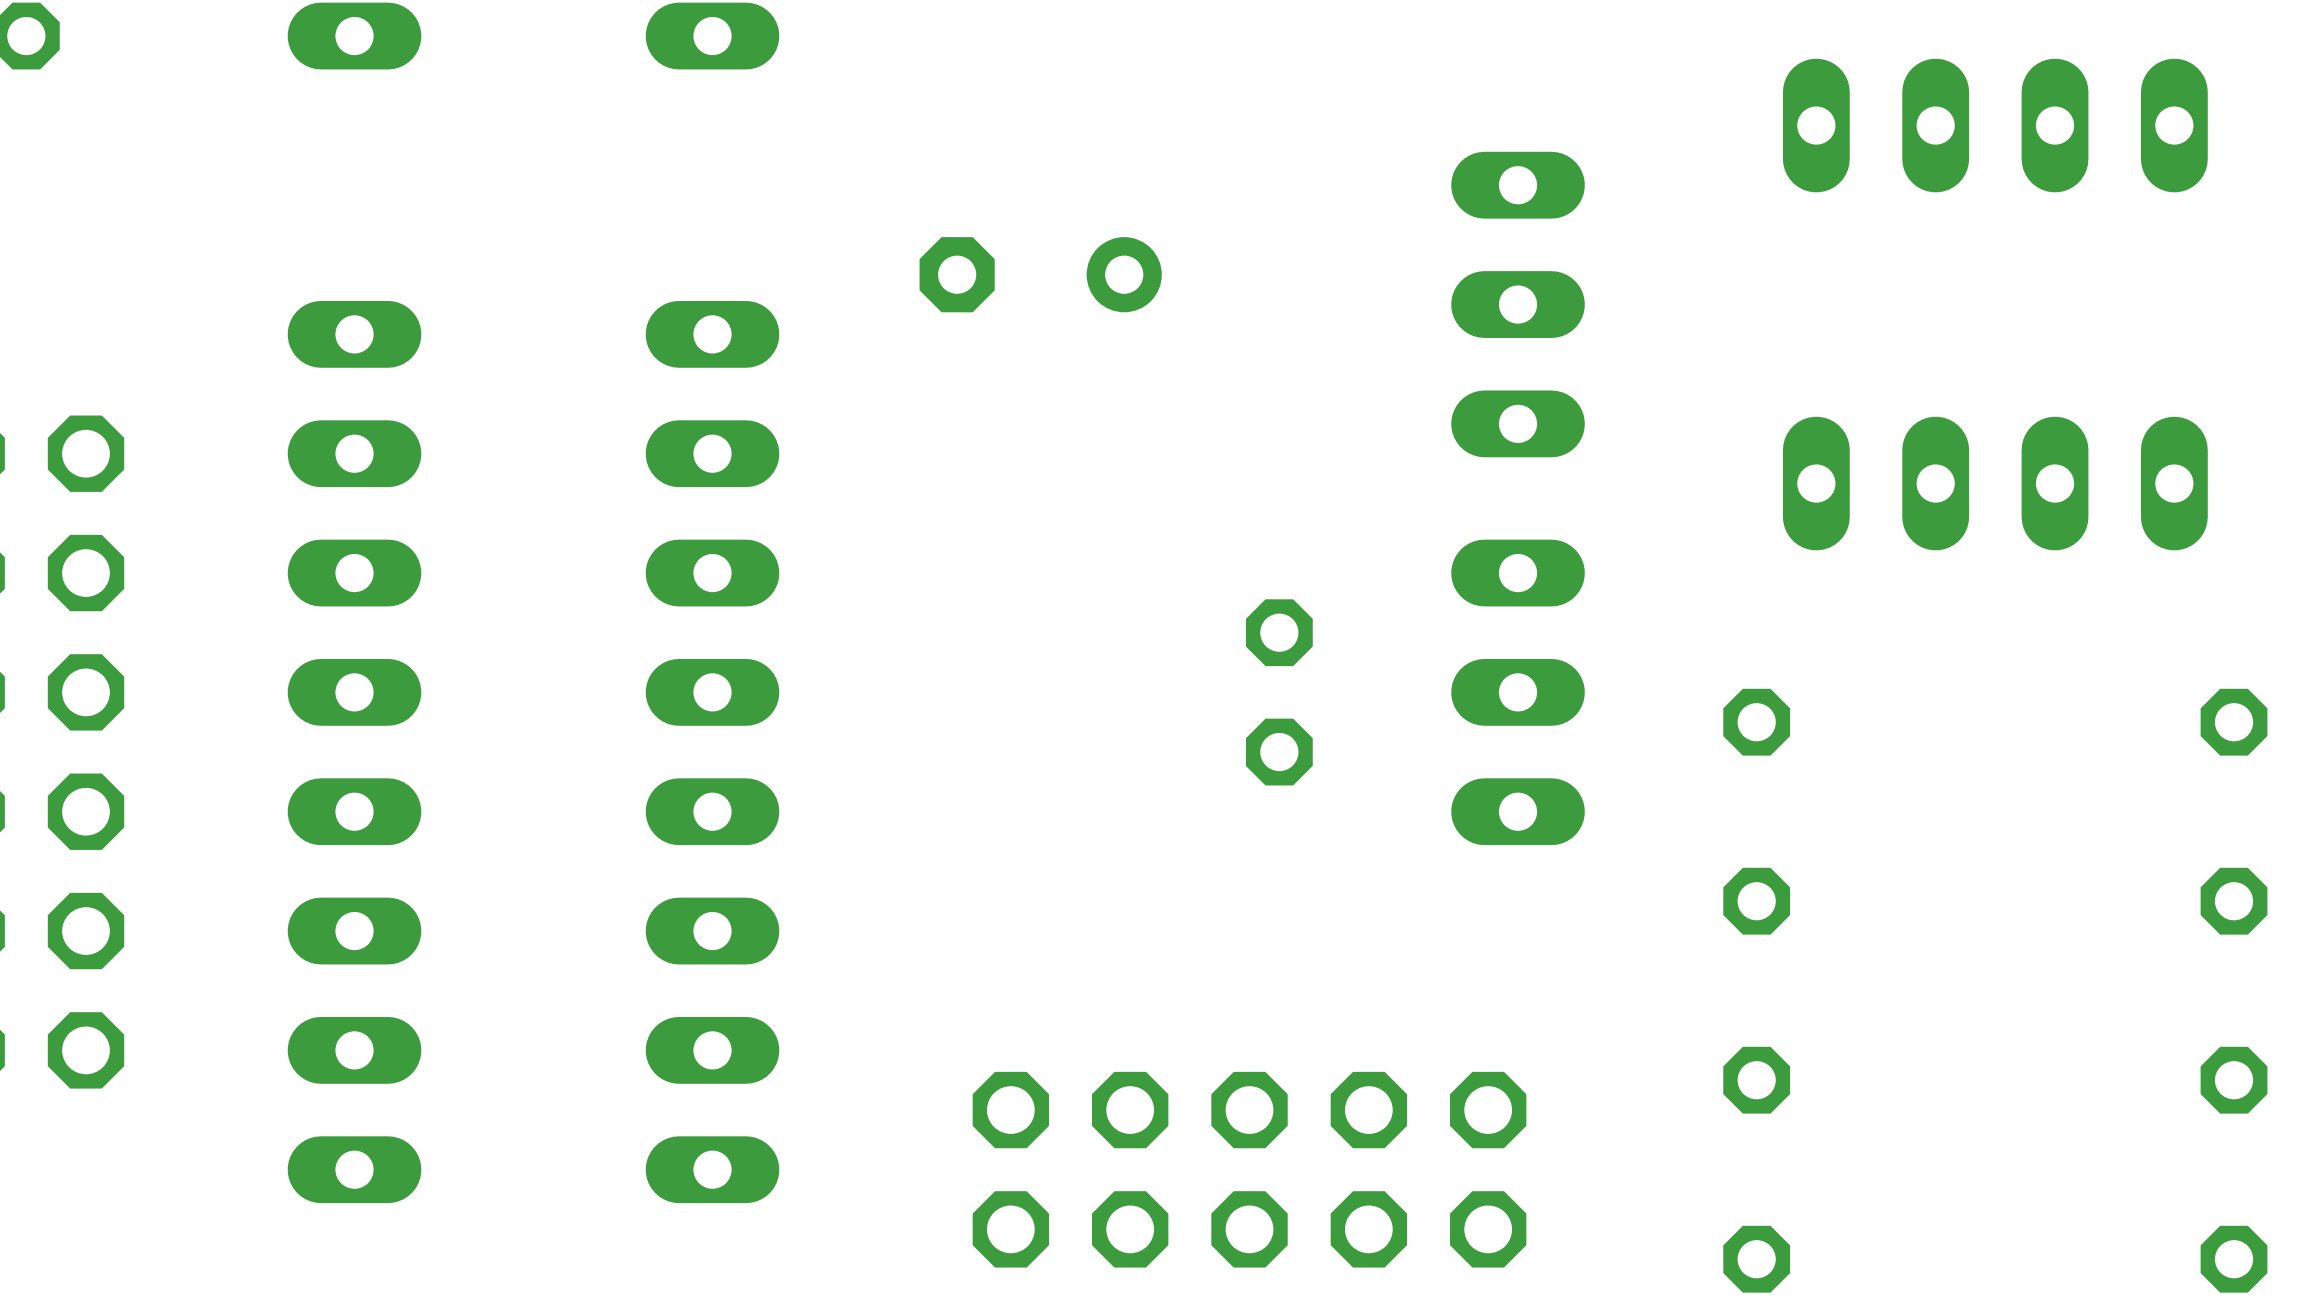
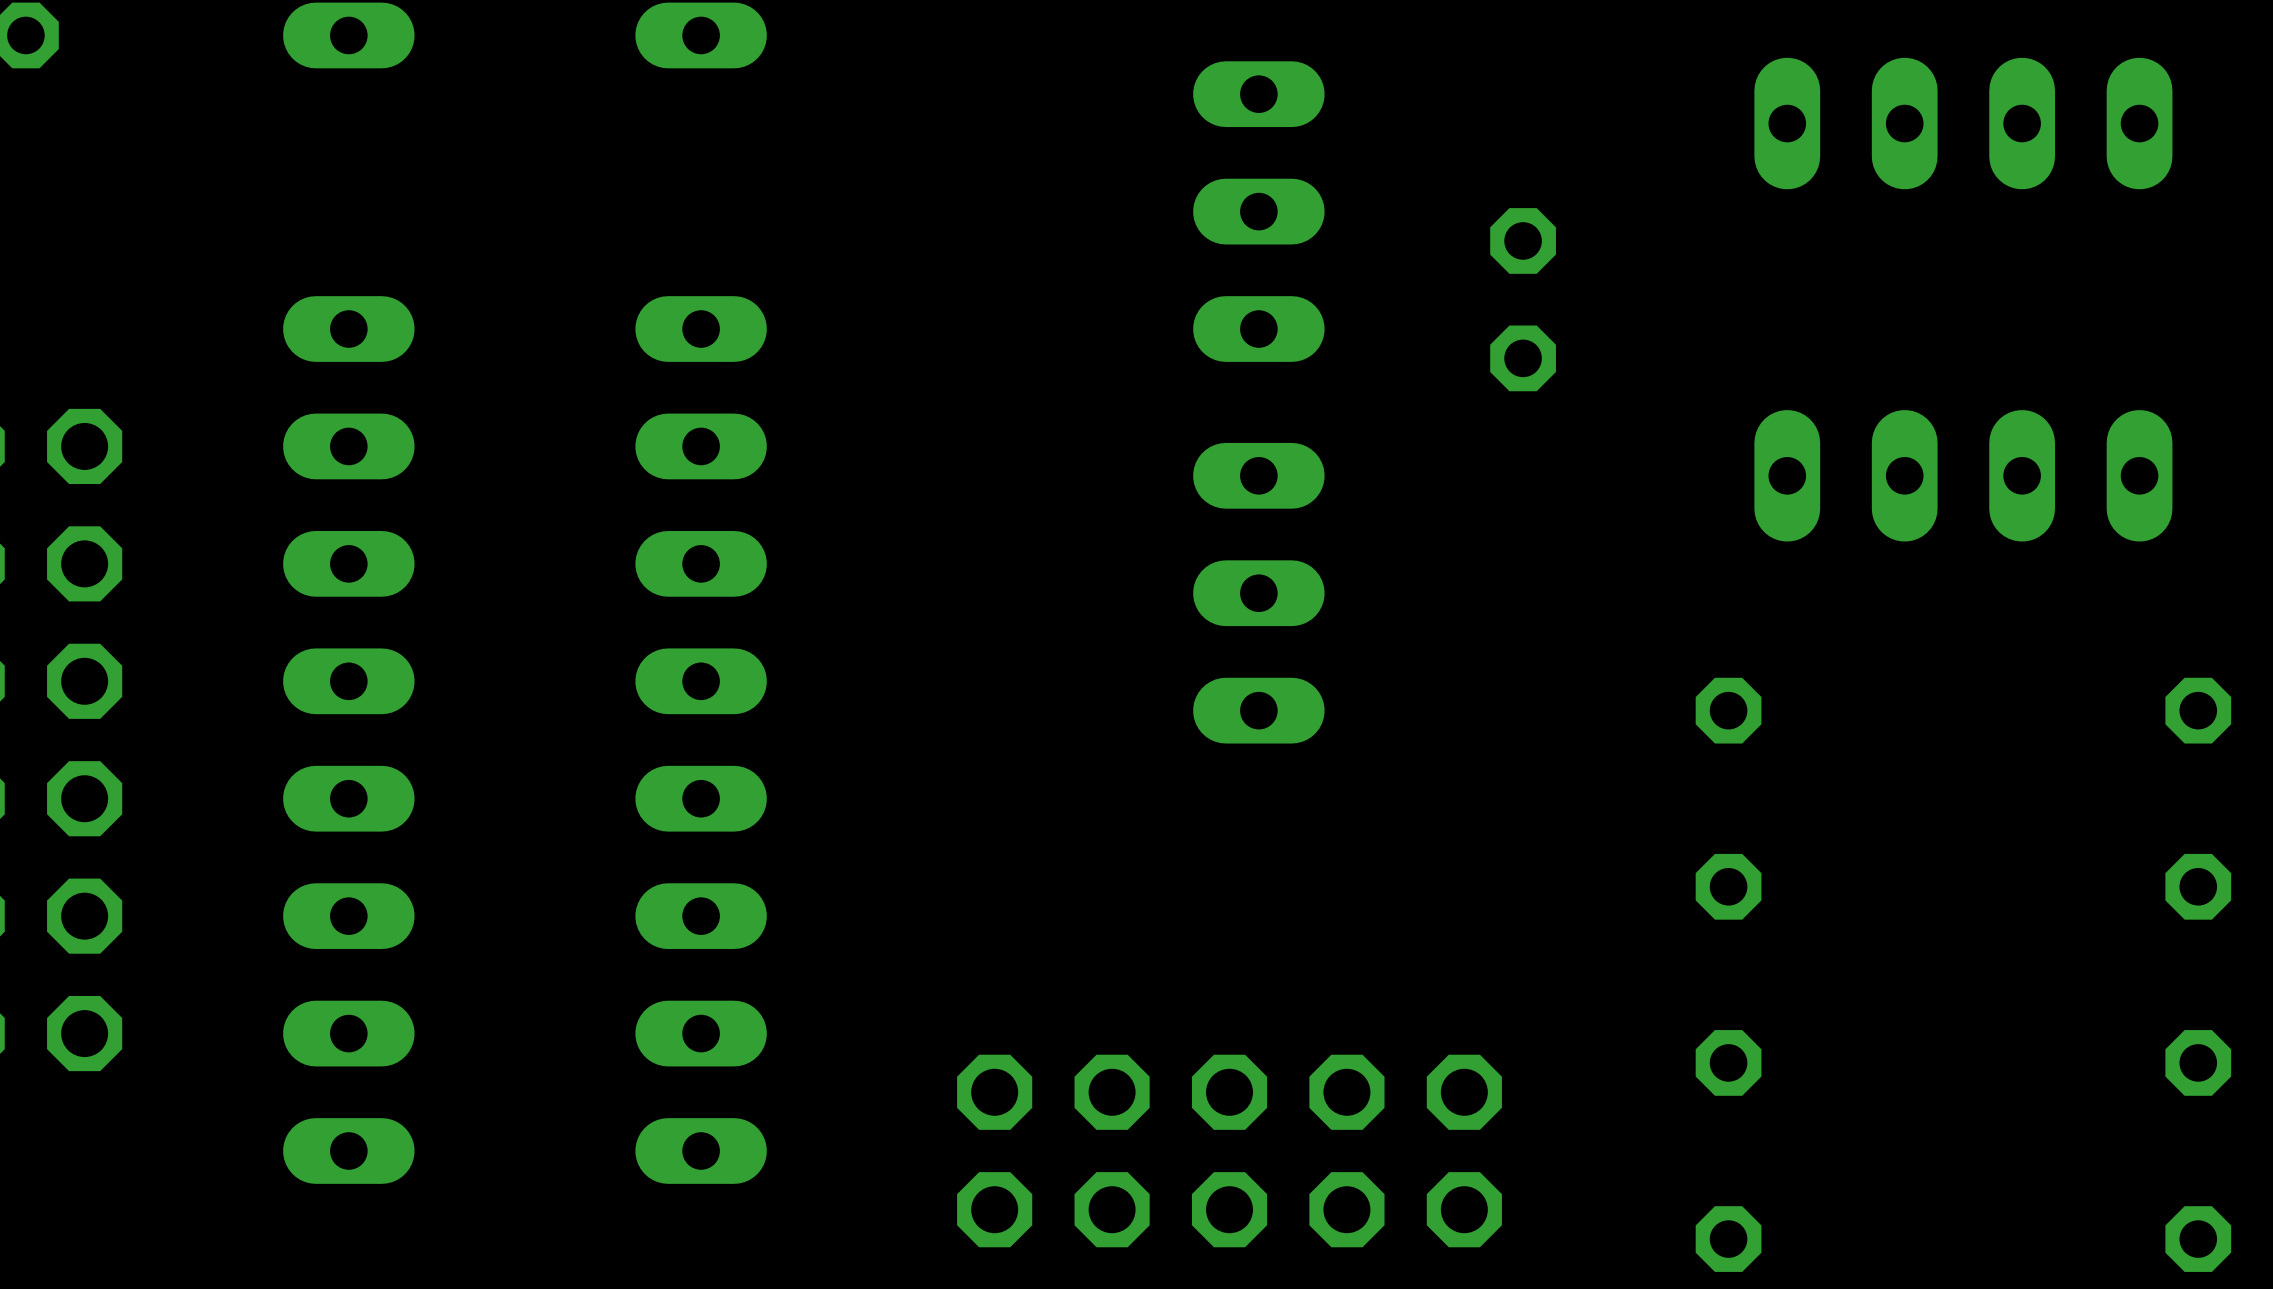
part footprint: [1451, 151, 1585, 458] -> [1490, 208, 1556, 392]
part: none -> (1258, 211)
part: (1040, 274) -> none
part: (1279, 692) -> none
part position: (1518, 692) -> (1258, 593)

